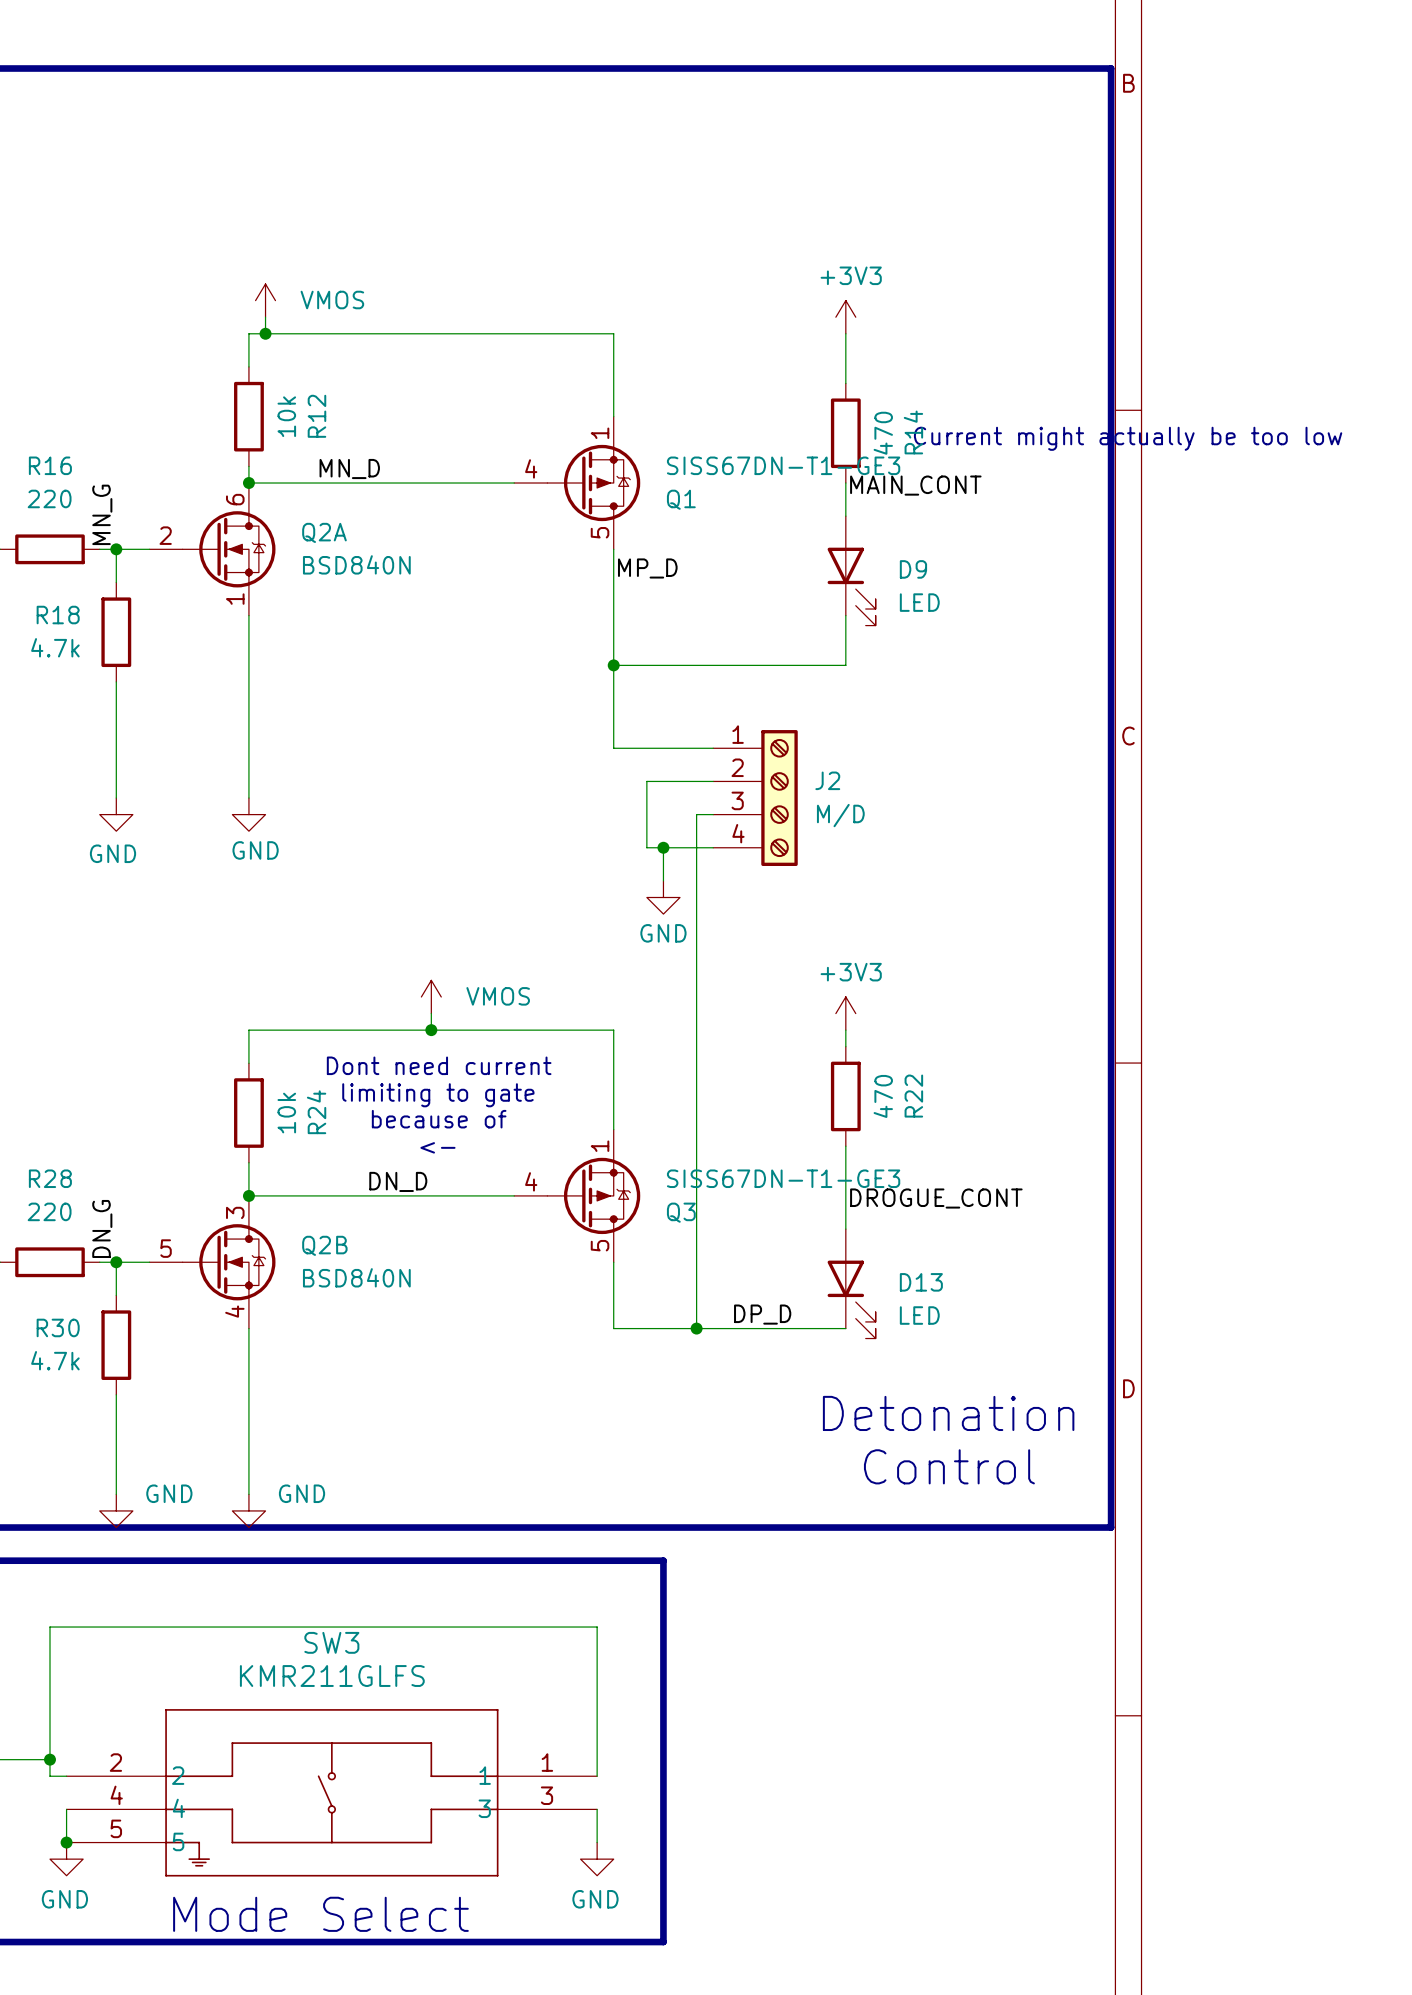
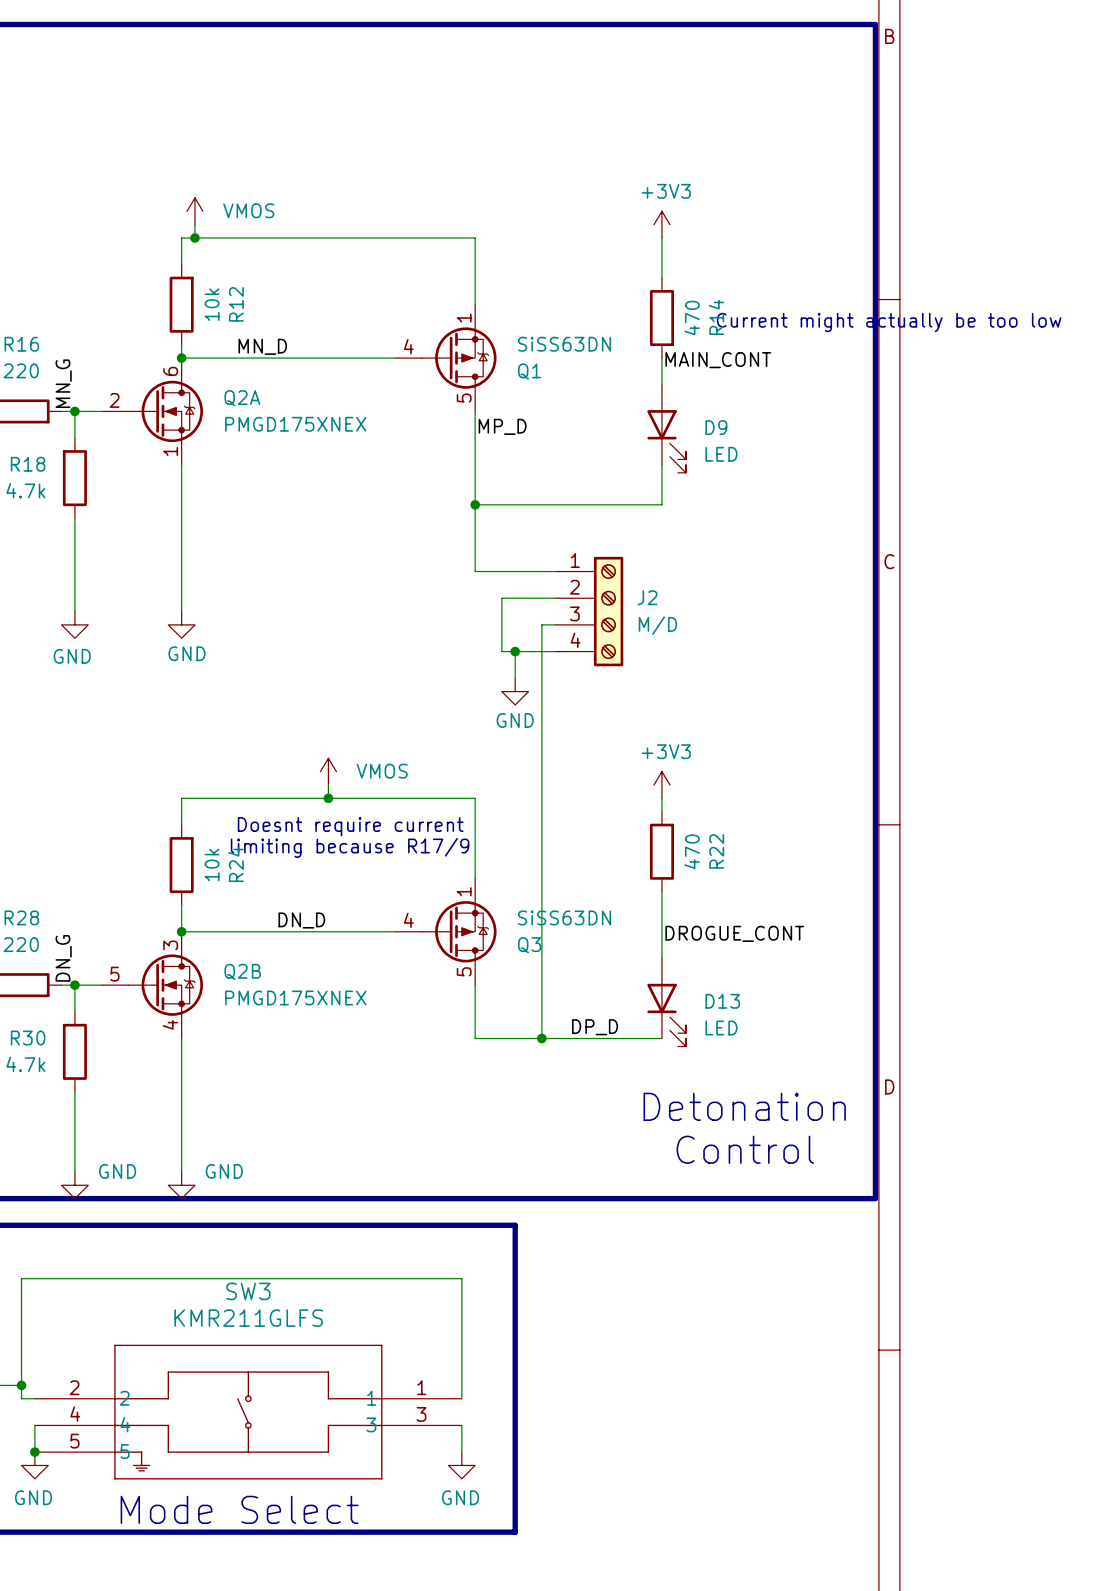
Q1 value: SISS67DN-T1-GE3 (783, 465) -> SiSS63DN (564, 344)
Q2A value: BSD840N (356, 564) -> PMGD175XNEX (295, 424)
text: Dont need current (439, 1065) -> Doesnt require current (350, 826)
text: none -> limiting because R17/9 (350, 847)
text: limiting to gate (438, 1095) -> none
text: because of (439, 1119) -> none
text: <- (437, 1147) -> none
Q3 value: SISS67DN-T1-GE3 (783, 1178) -> SiSS63DN (564, 917)
Q2B value: BSD840N (356, 1277) -> PMGD175XNEX (295, 997)

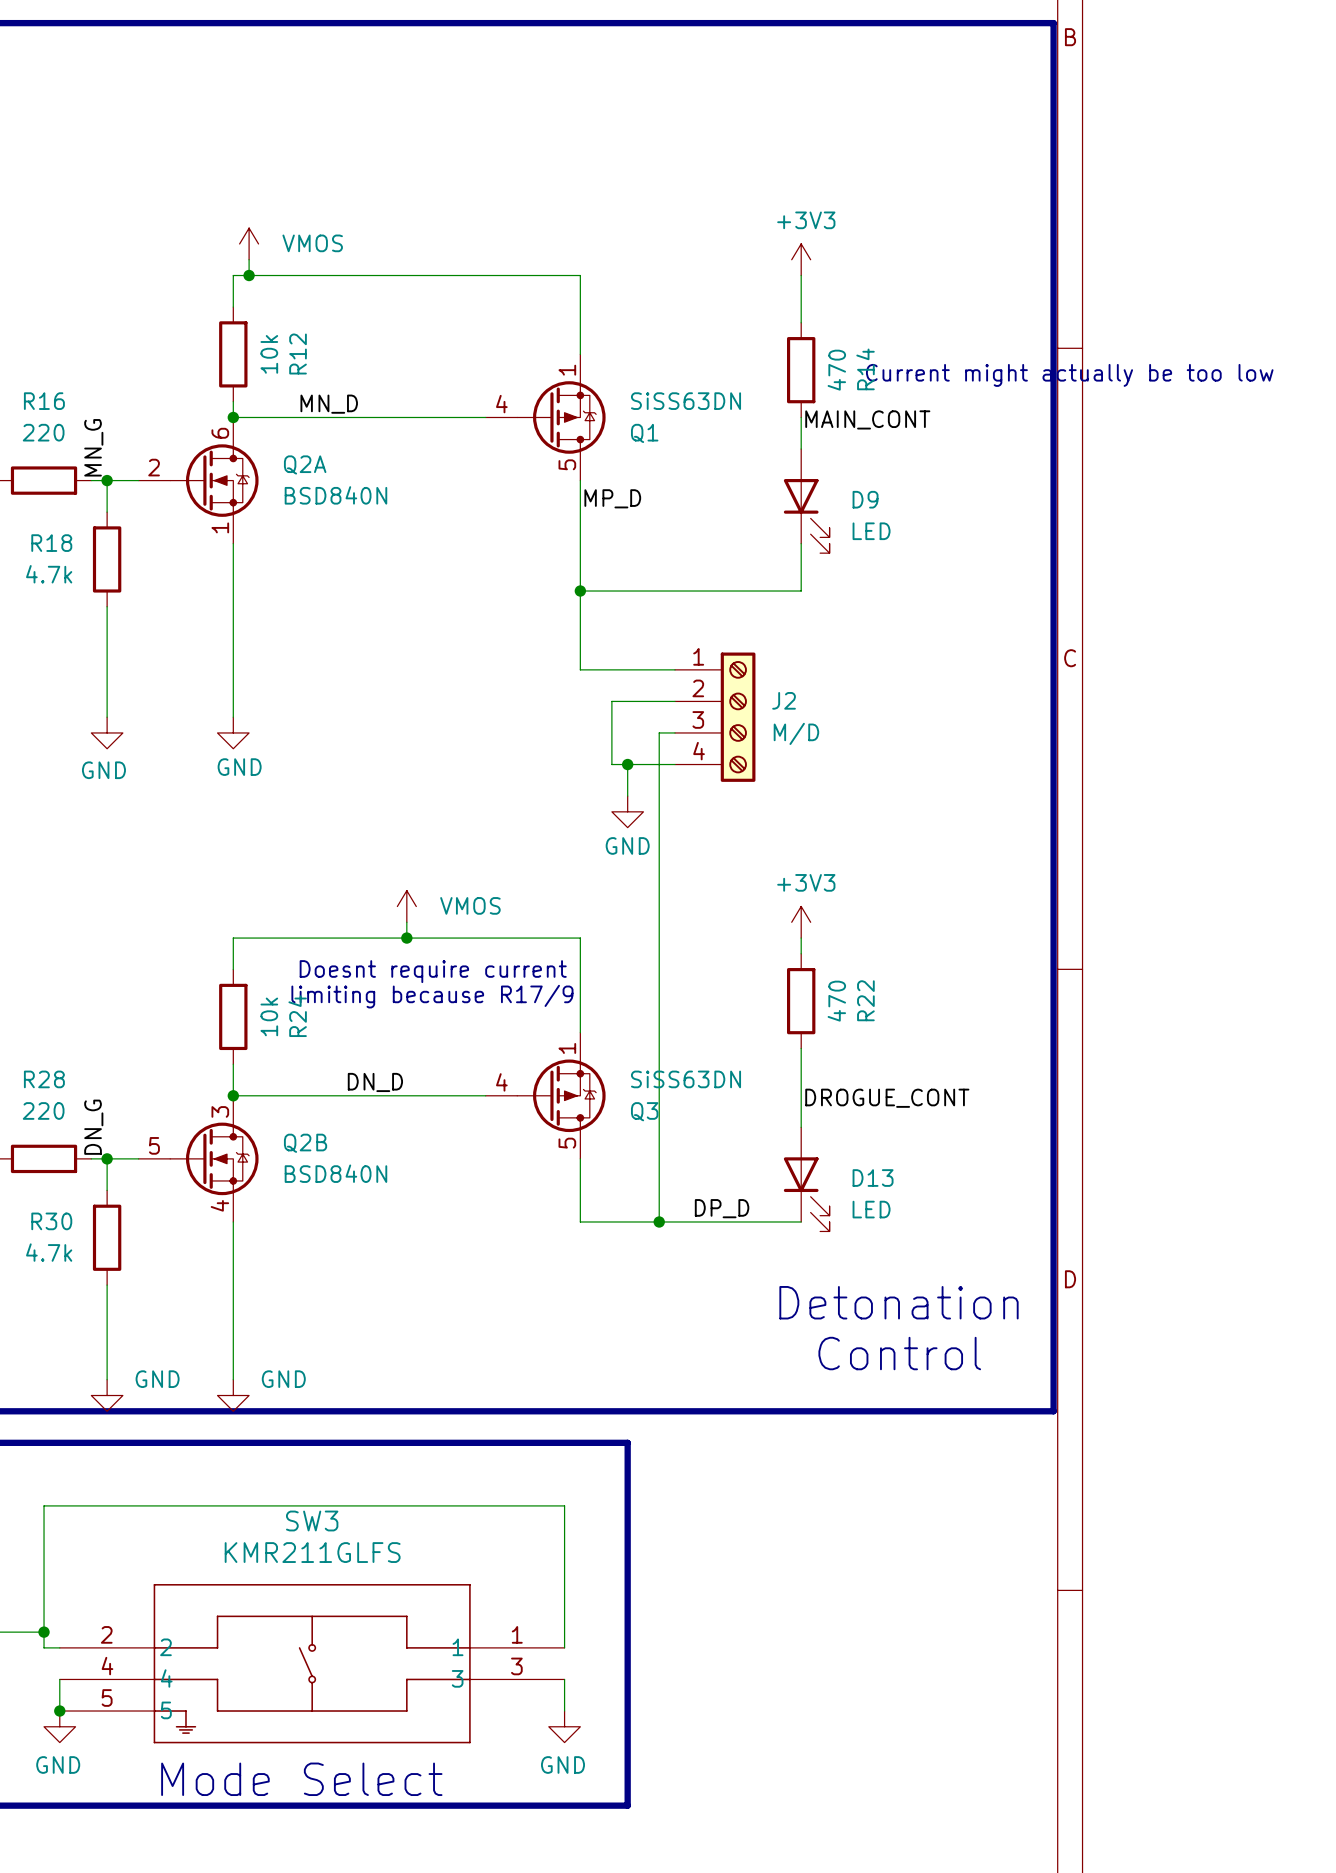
Q2A value: PMGD175XNEX (295, 424) -> BSD840N (335, 495)
Q2B value: PMGD175XNEX (295, 997) -> BSD840N (335, 1173)

